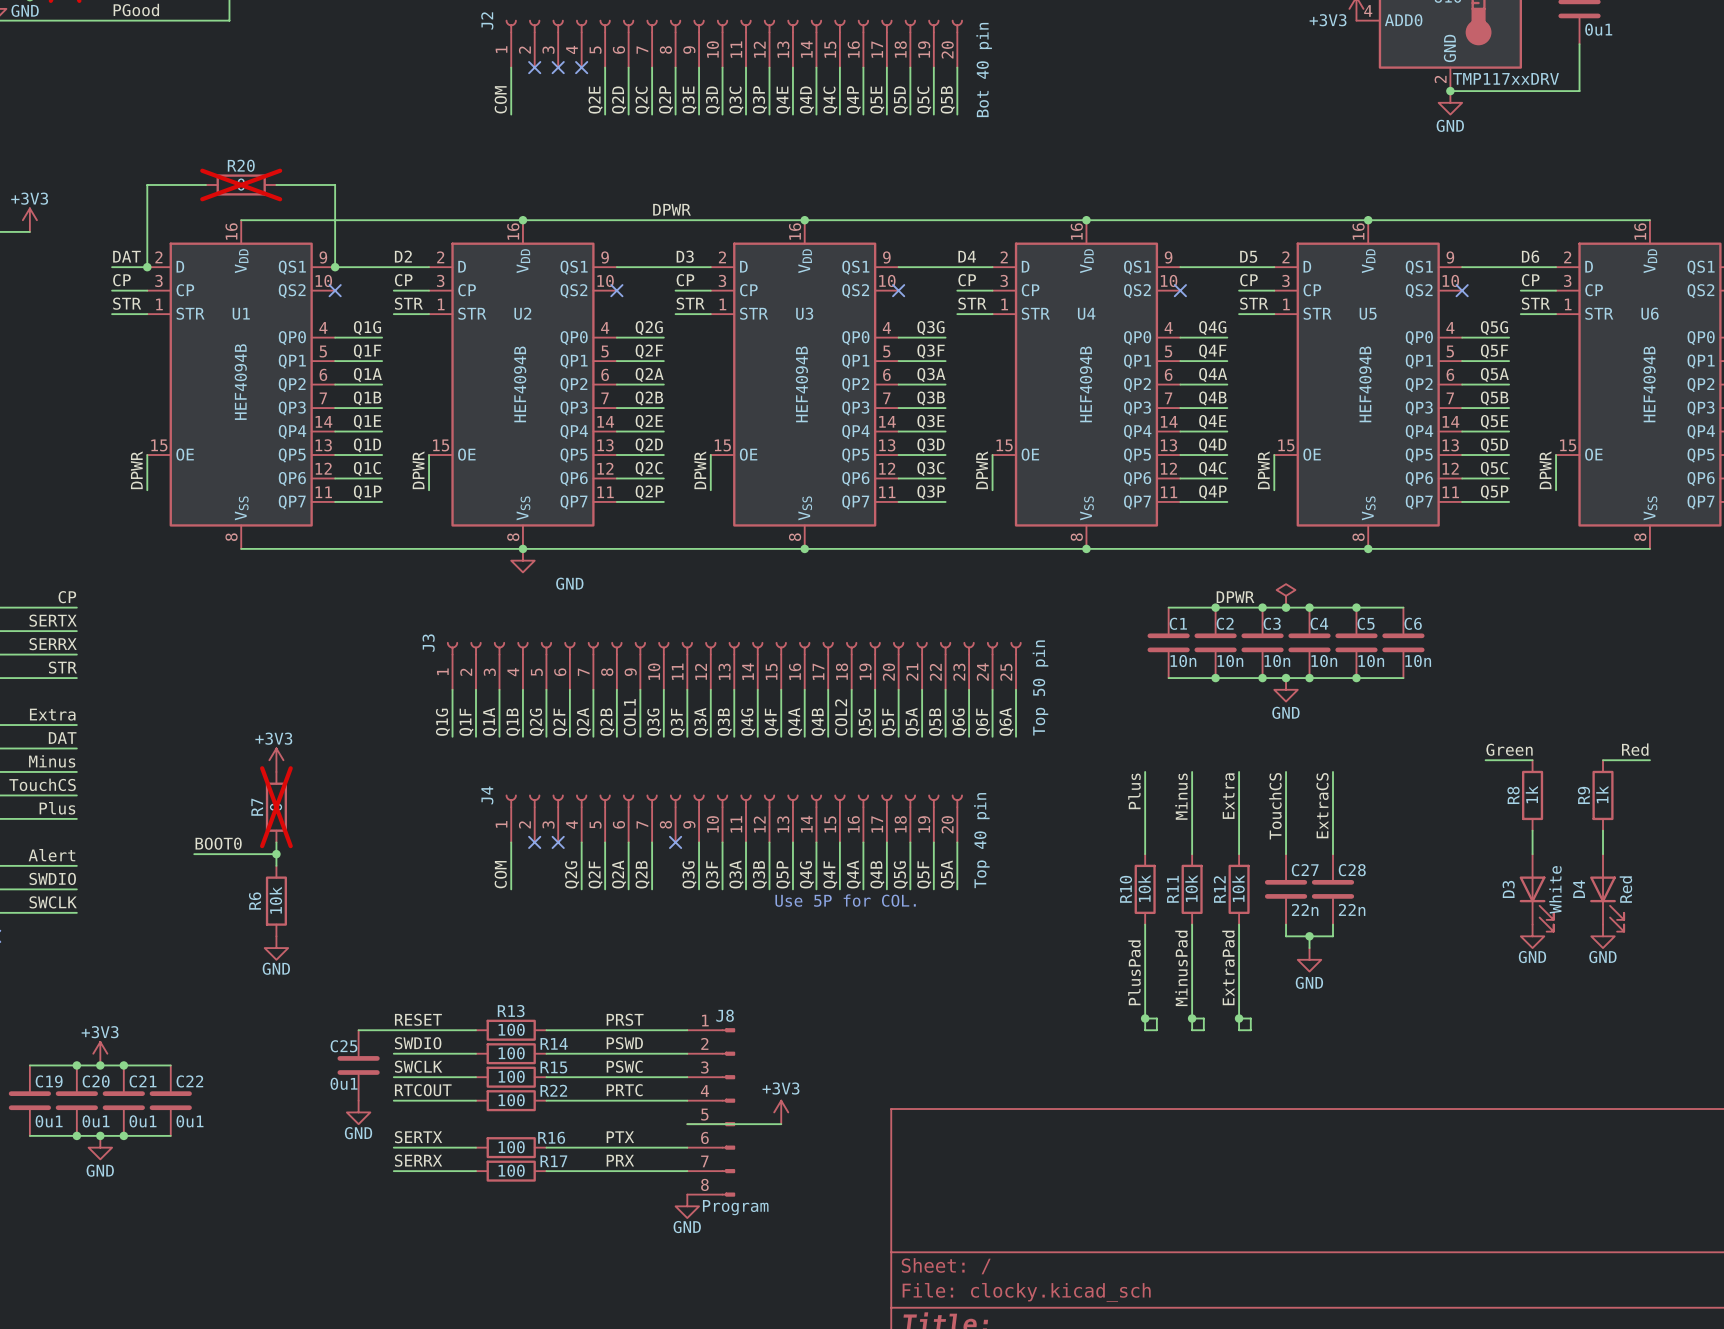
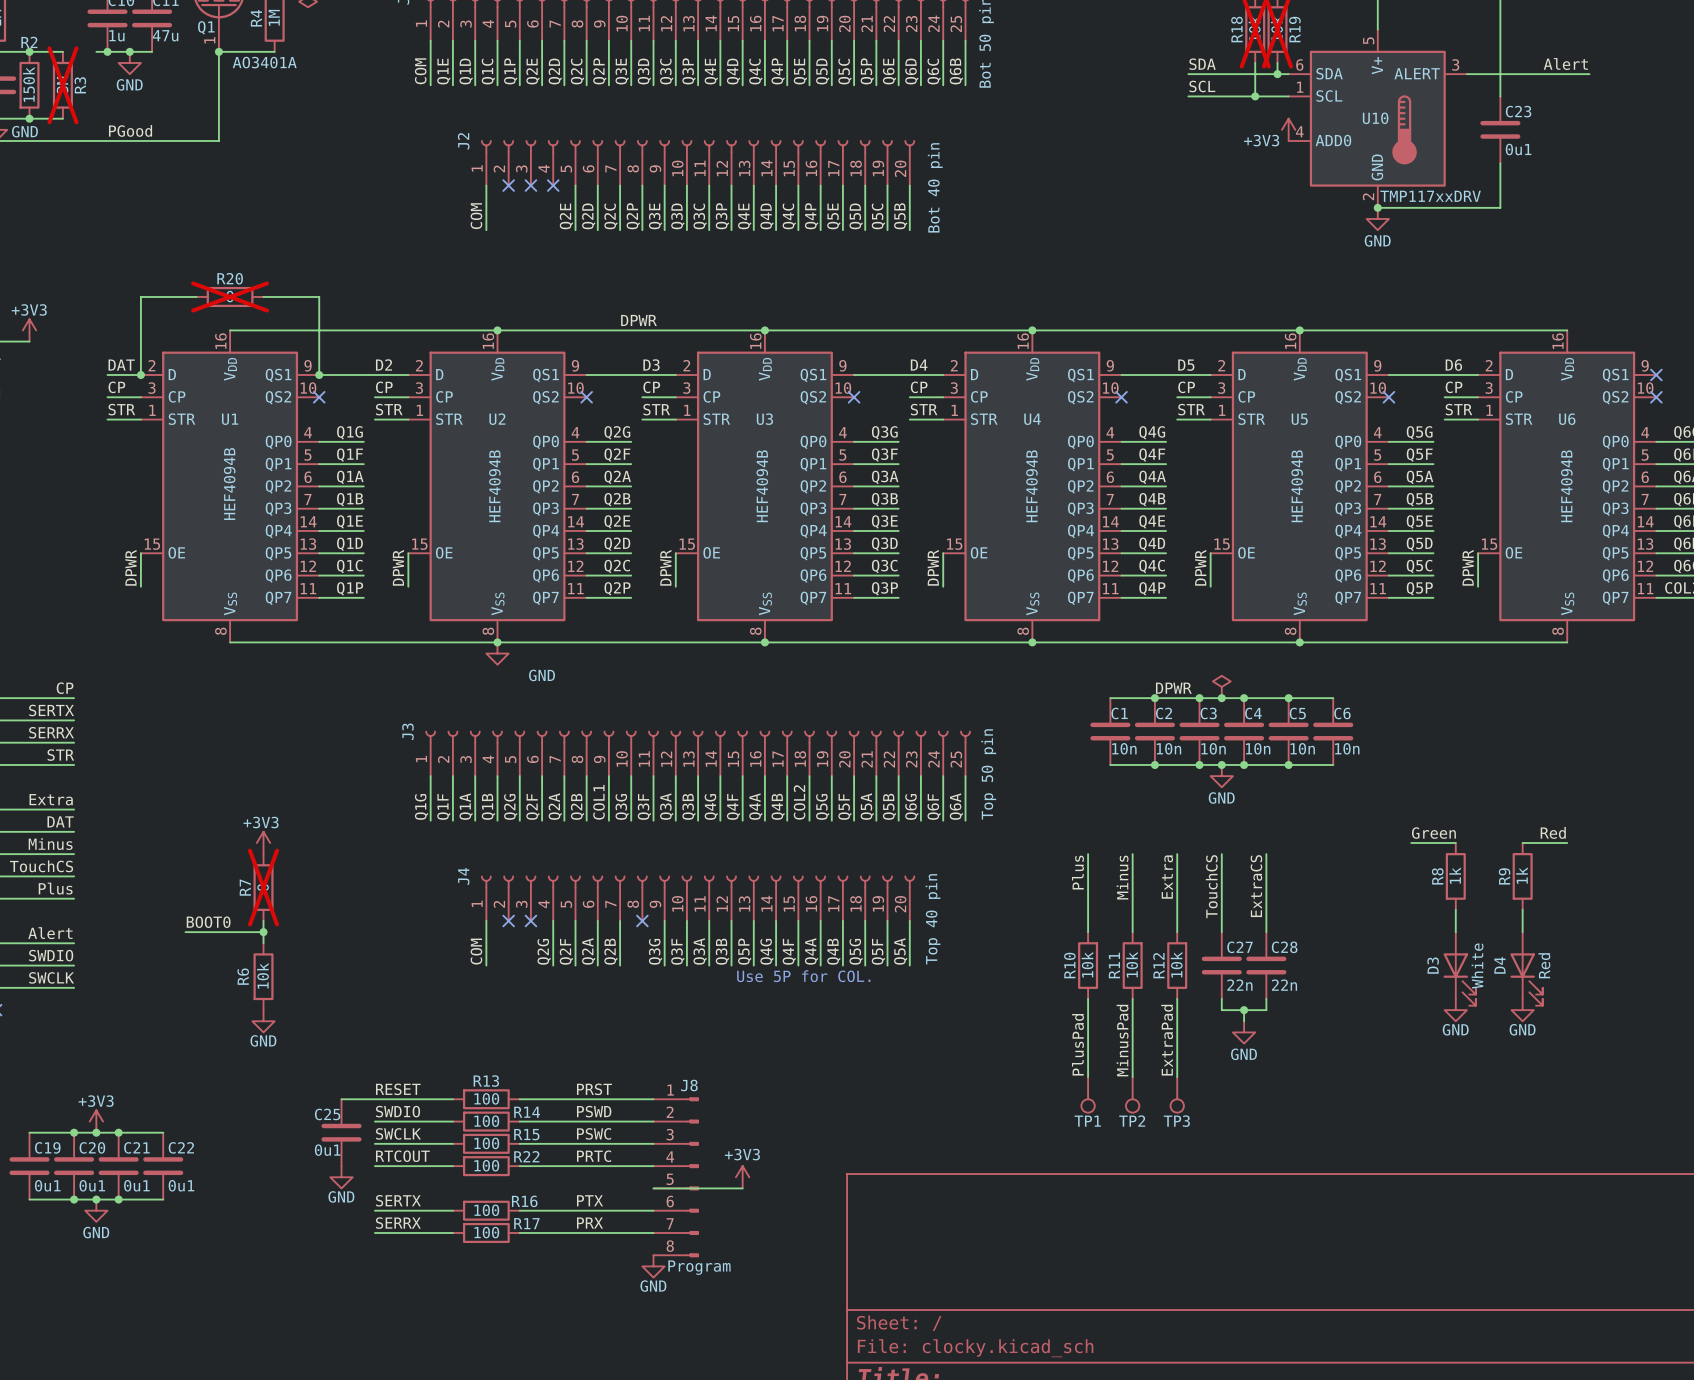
wire: (1145, 1006) (1145, 1030) (1156, 1030) (1156, 1018) (1145, 1018) -> none
wire: (1192, 1006) (1192, 1030) (1203, 1030) (1203, 1018) (1192, 1018) -> none
wire: (1239, 1006) (1239, 1030) (1250, 1030) (1250, 1018) (1239, 1018) -> none
junction: (1145, 1018) -> none
junction: (1192, 1018) -> none
junction: (1239, 1018) -> none
TP1: none -> (1088, 1094)
TP2: none -> (1132, 1094)
TP3: none -> (1177, 1094)

